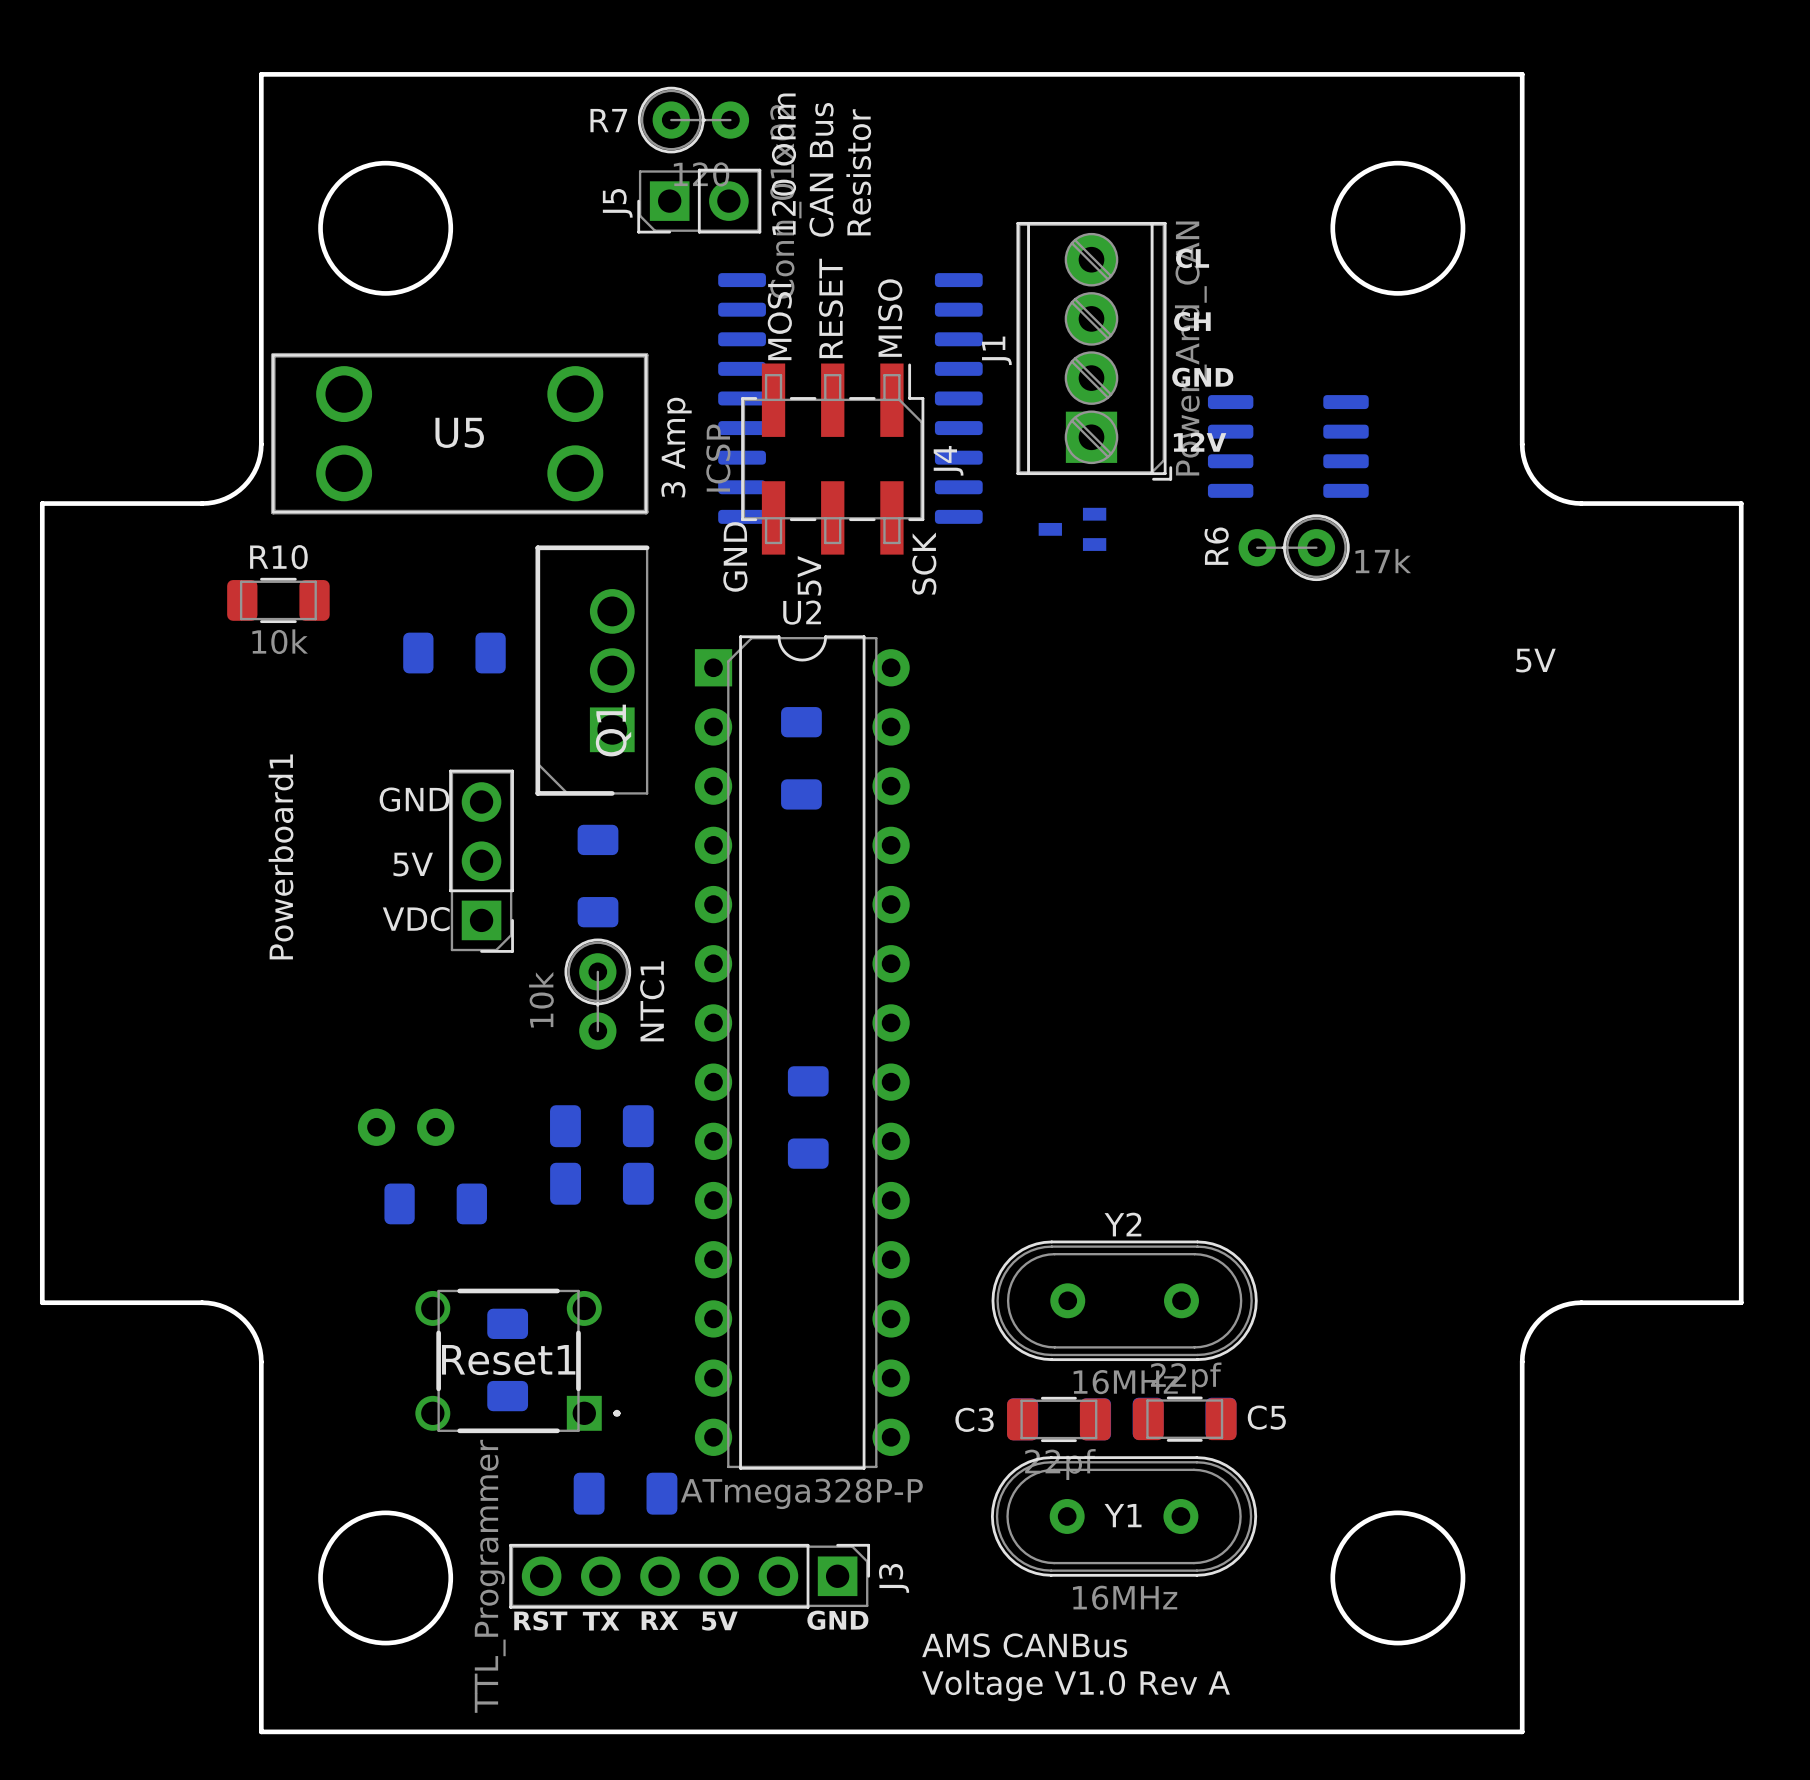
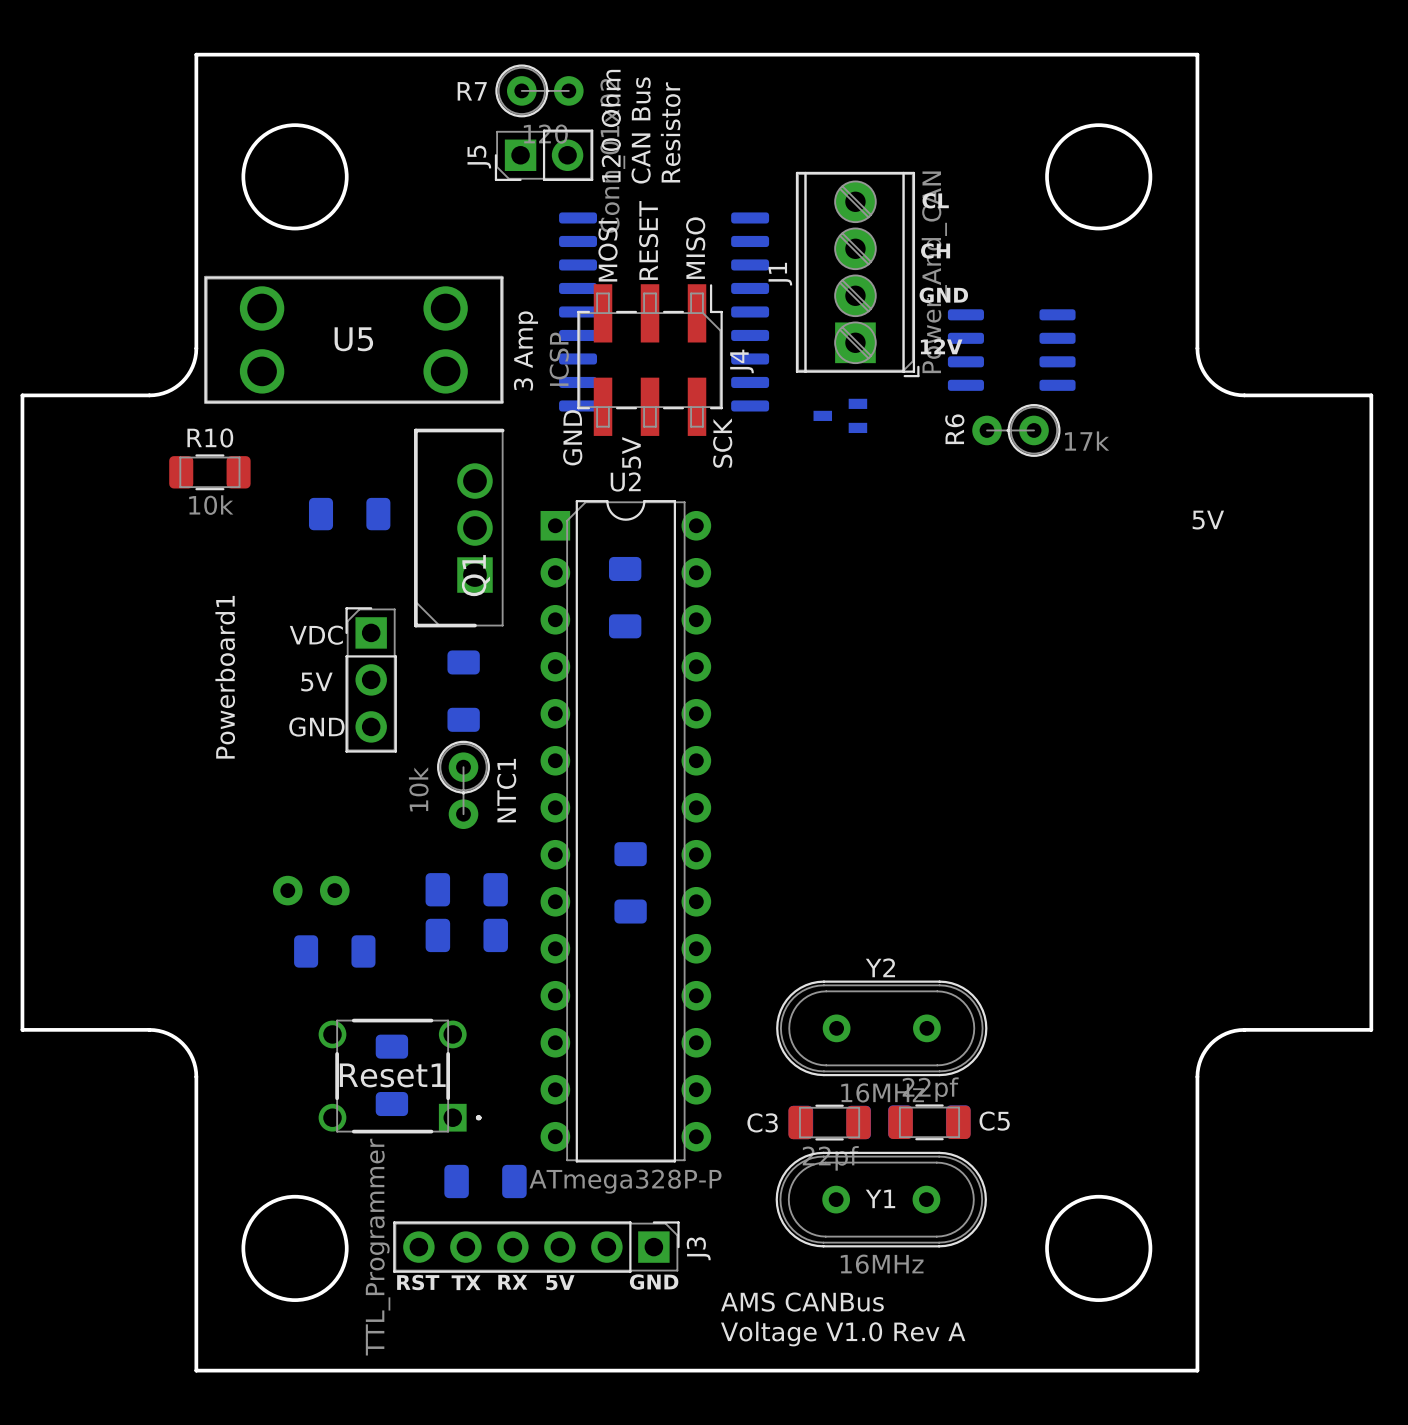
text: GND (414, 799) -> VDC (316, 635)
Powerboard1 rotation: 0° (481, 861) -> 180° (371, 679)
text: VDC (416, 919) -> GND (316, 727)

